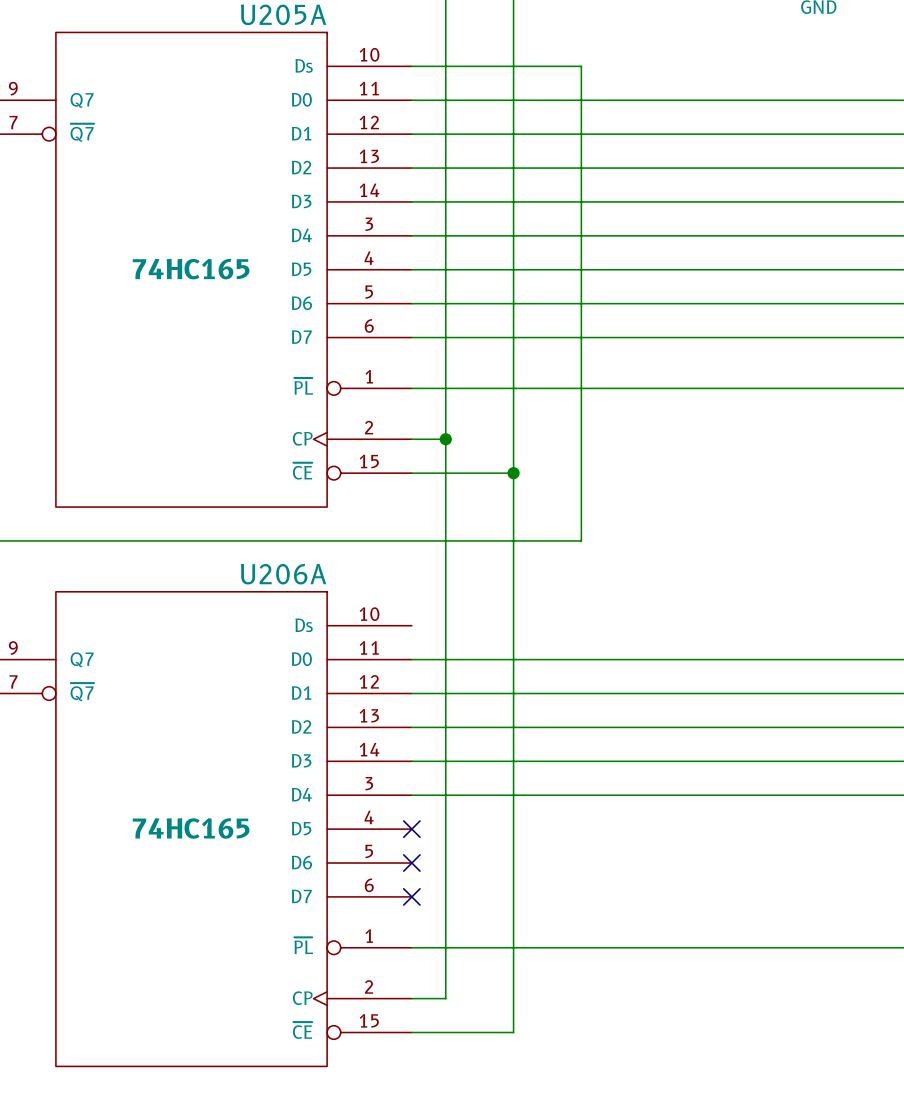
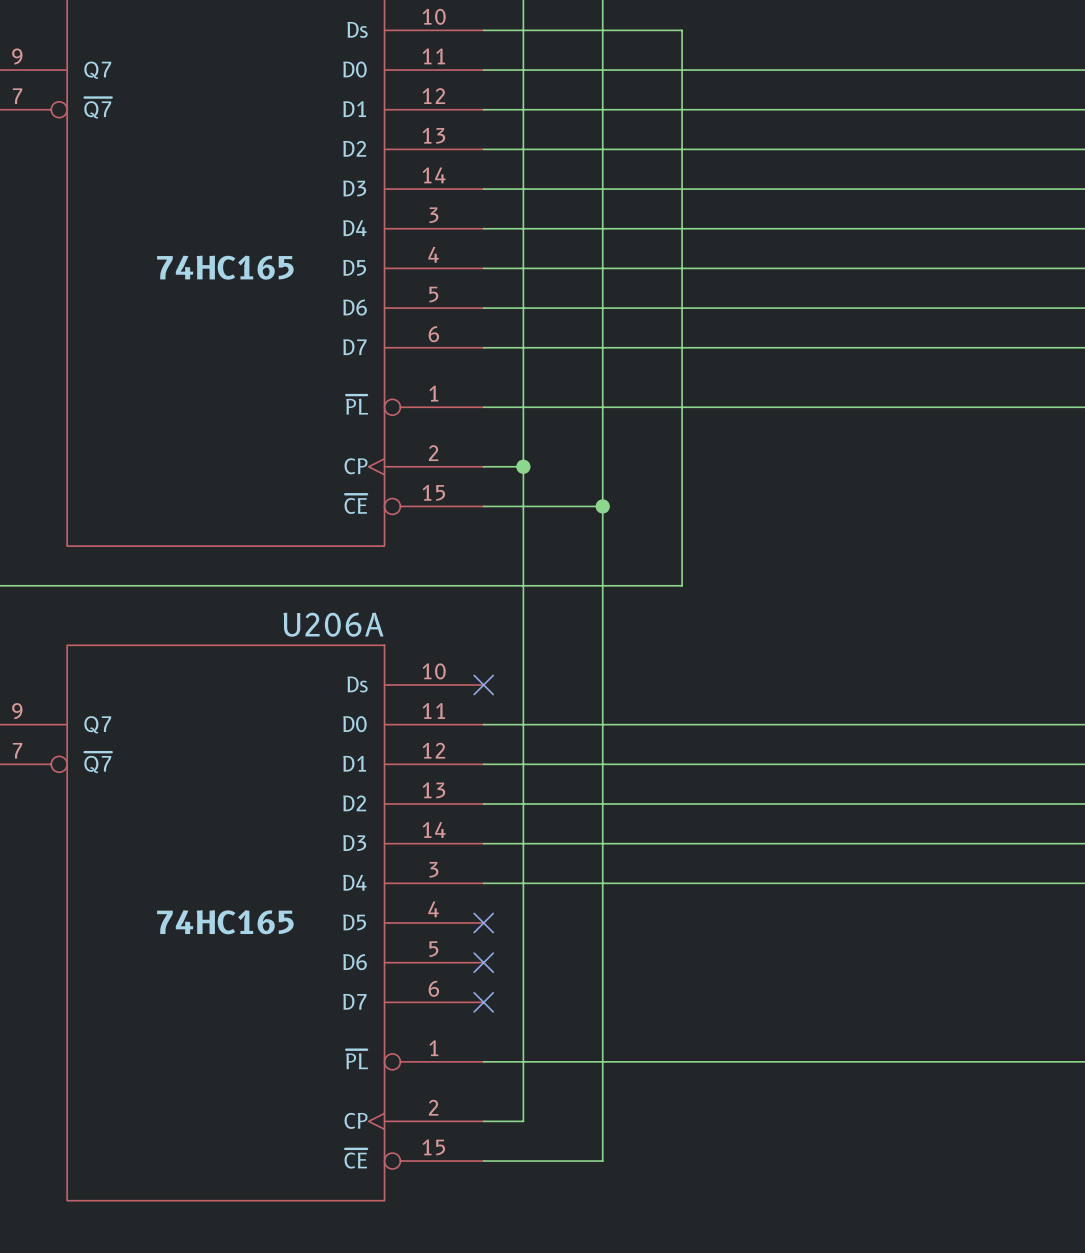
no-connect mark: none -> (483, 684)

